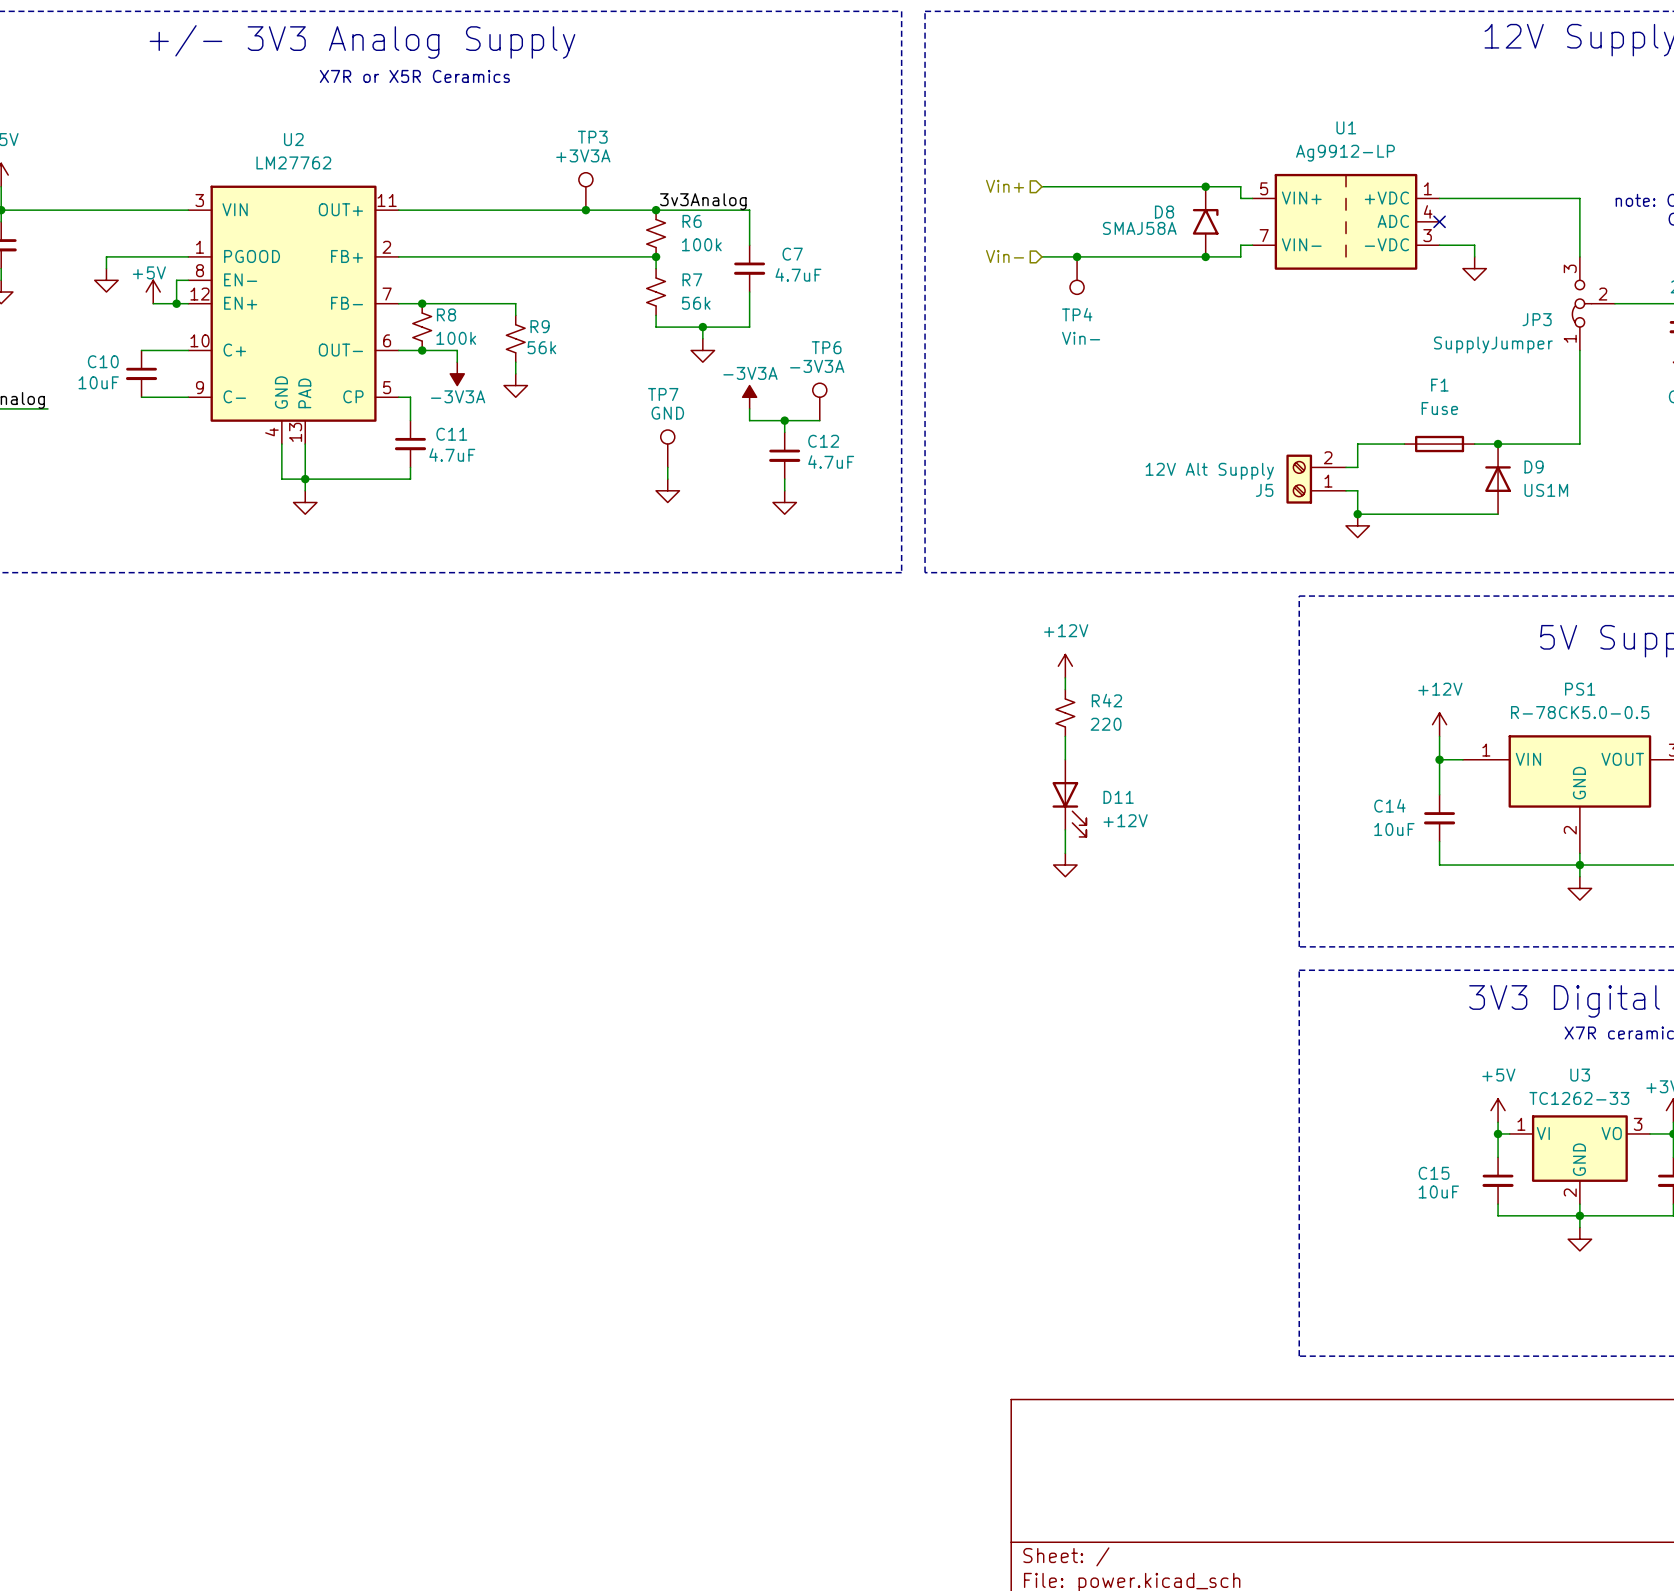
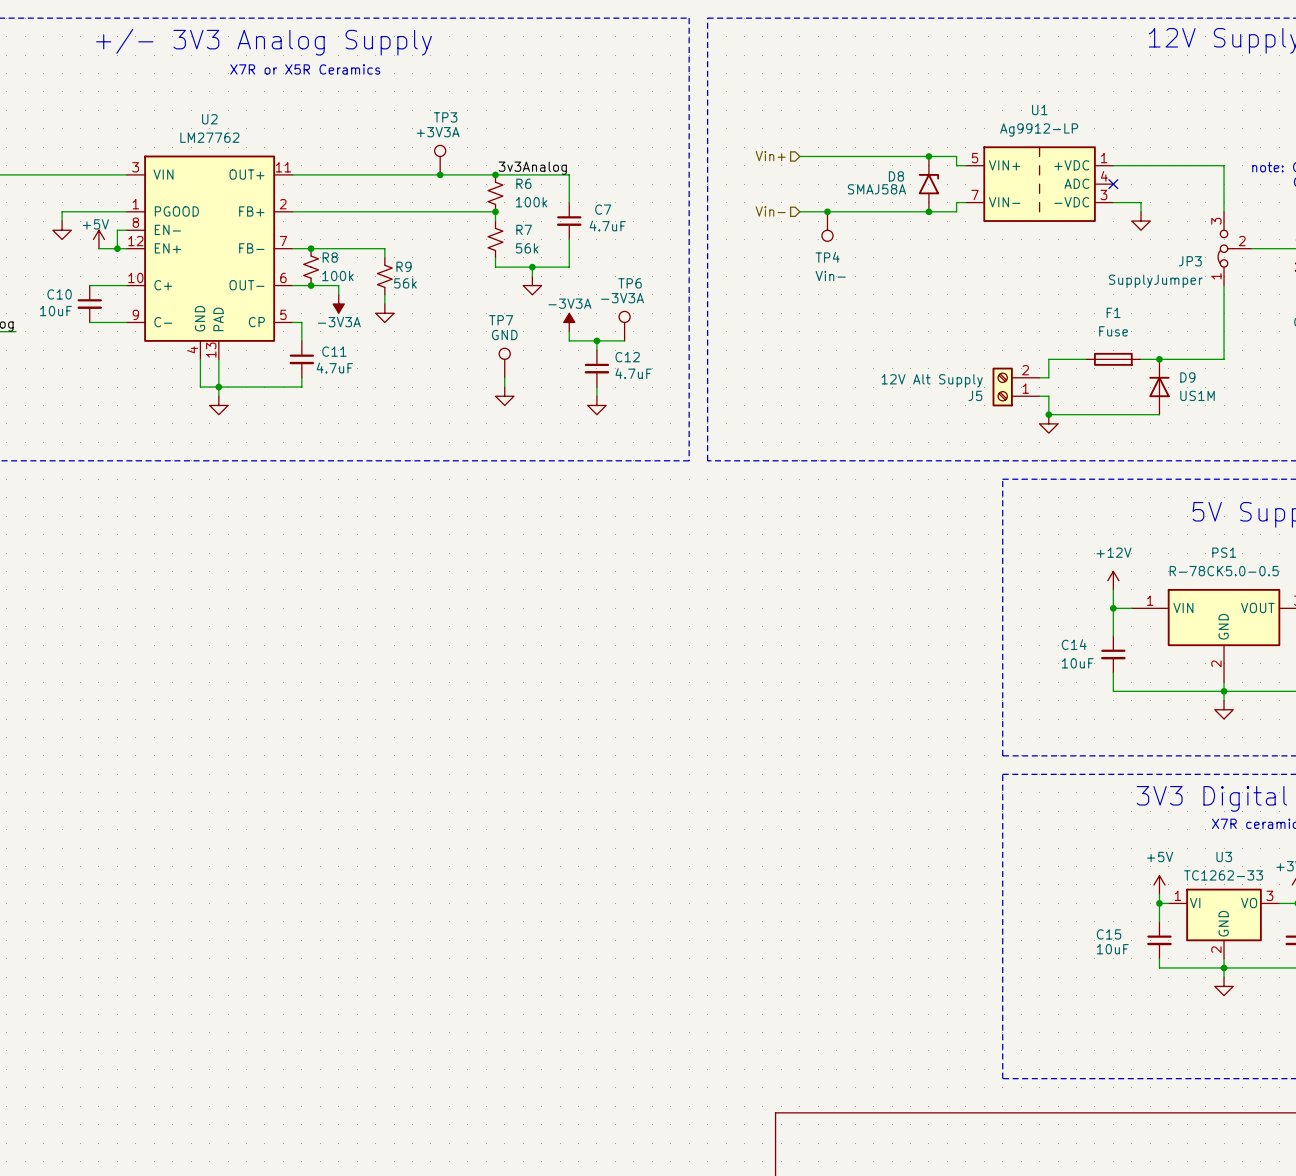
power symbol: +12V (1065, 666) -> none
wire: (1065, 677) (1065, 689) -> none
R42: 220 (1065, 712) -> none
wire: (1065, 736) (1065, 759) -> none
D11: +12V (1069, 798) -> none
wire: (1065, 829) (1065, 853) -> none
power symbol: (1065, 865) -> none

